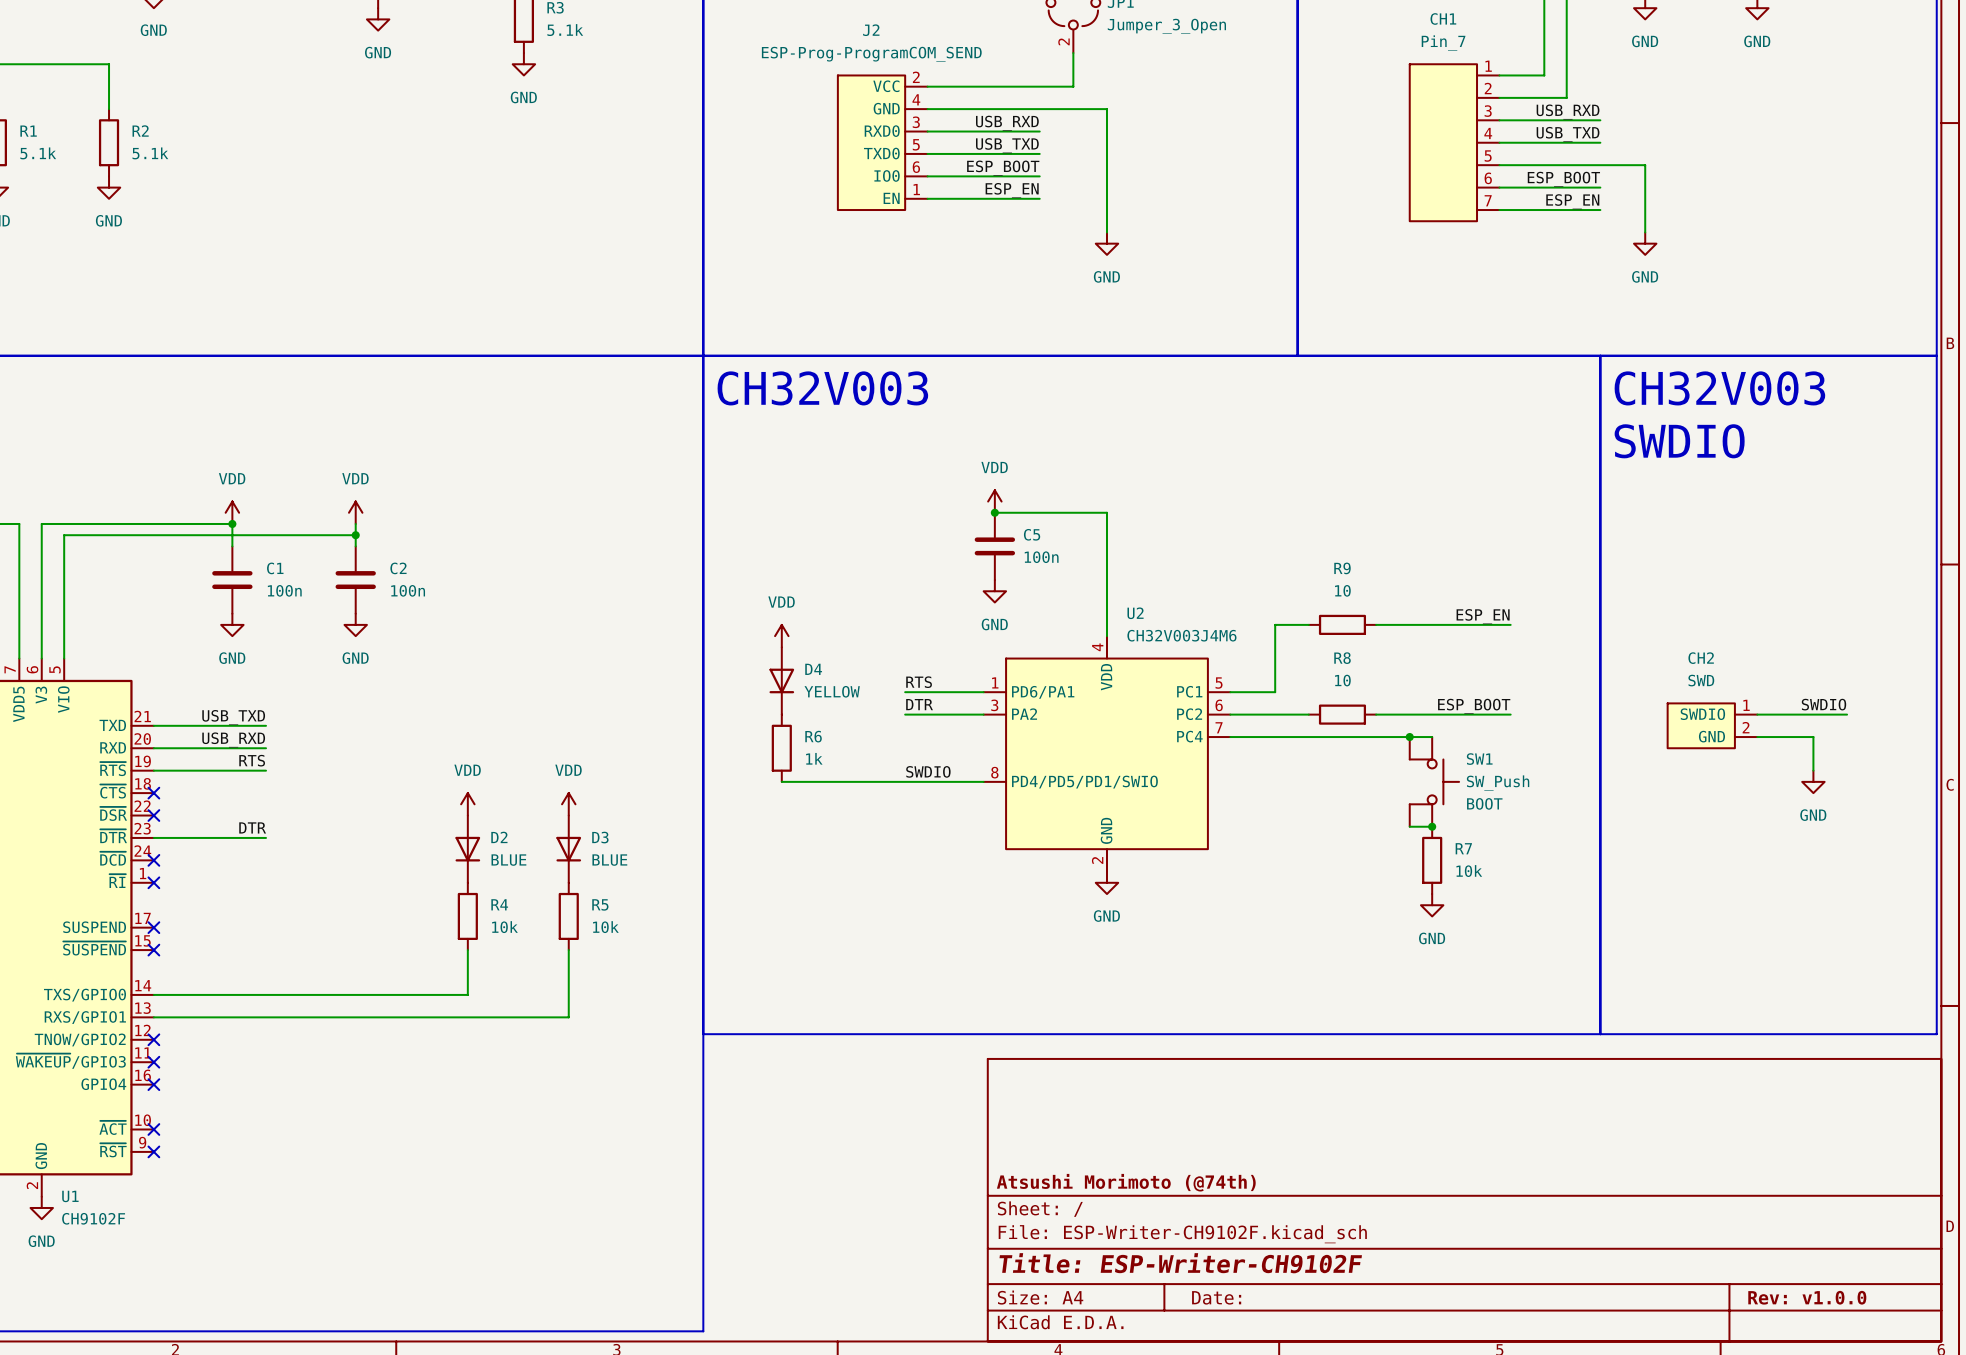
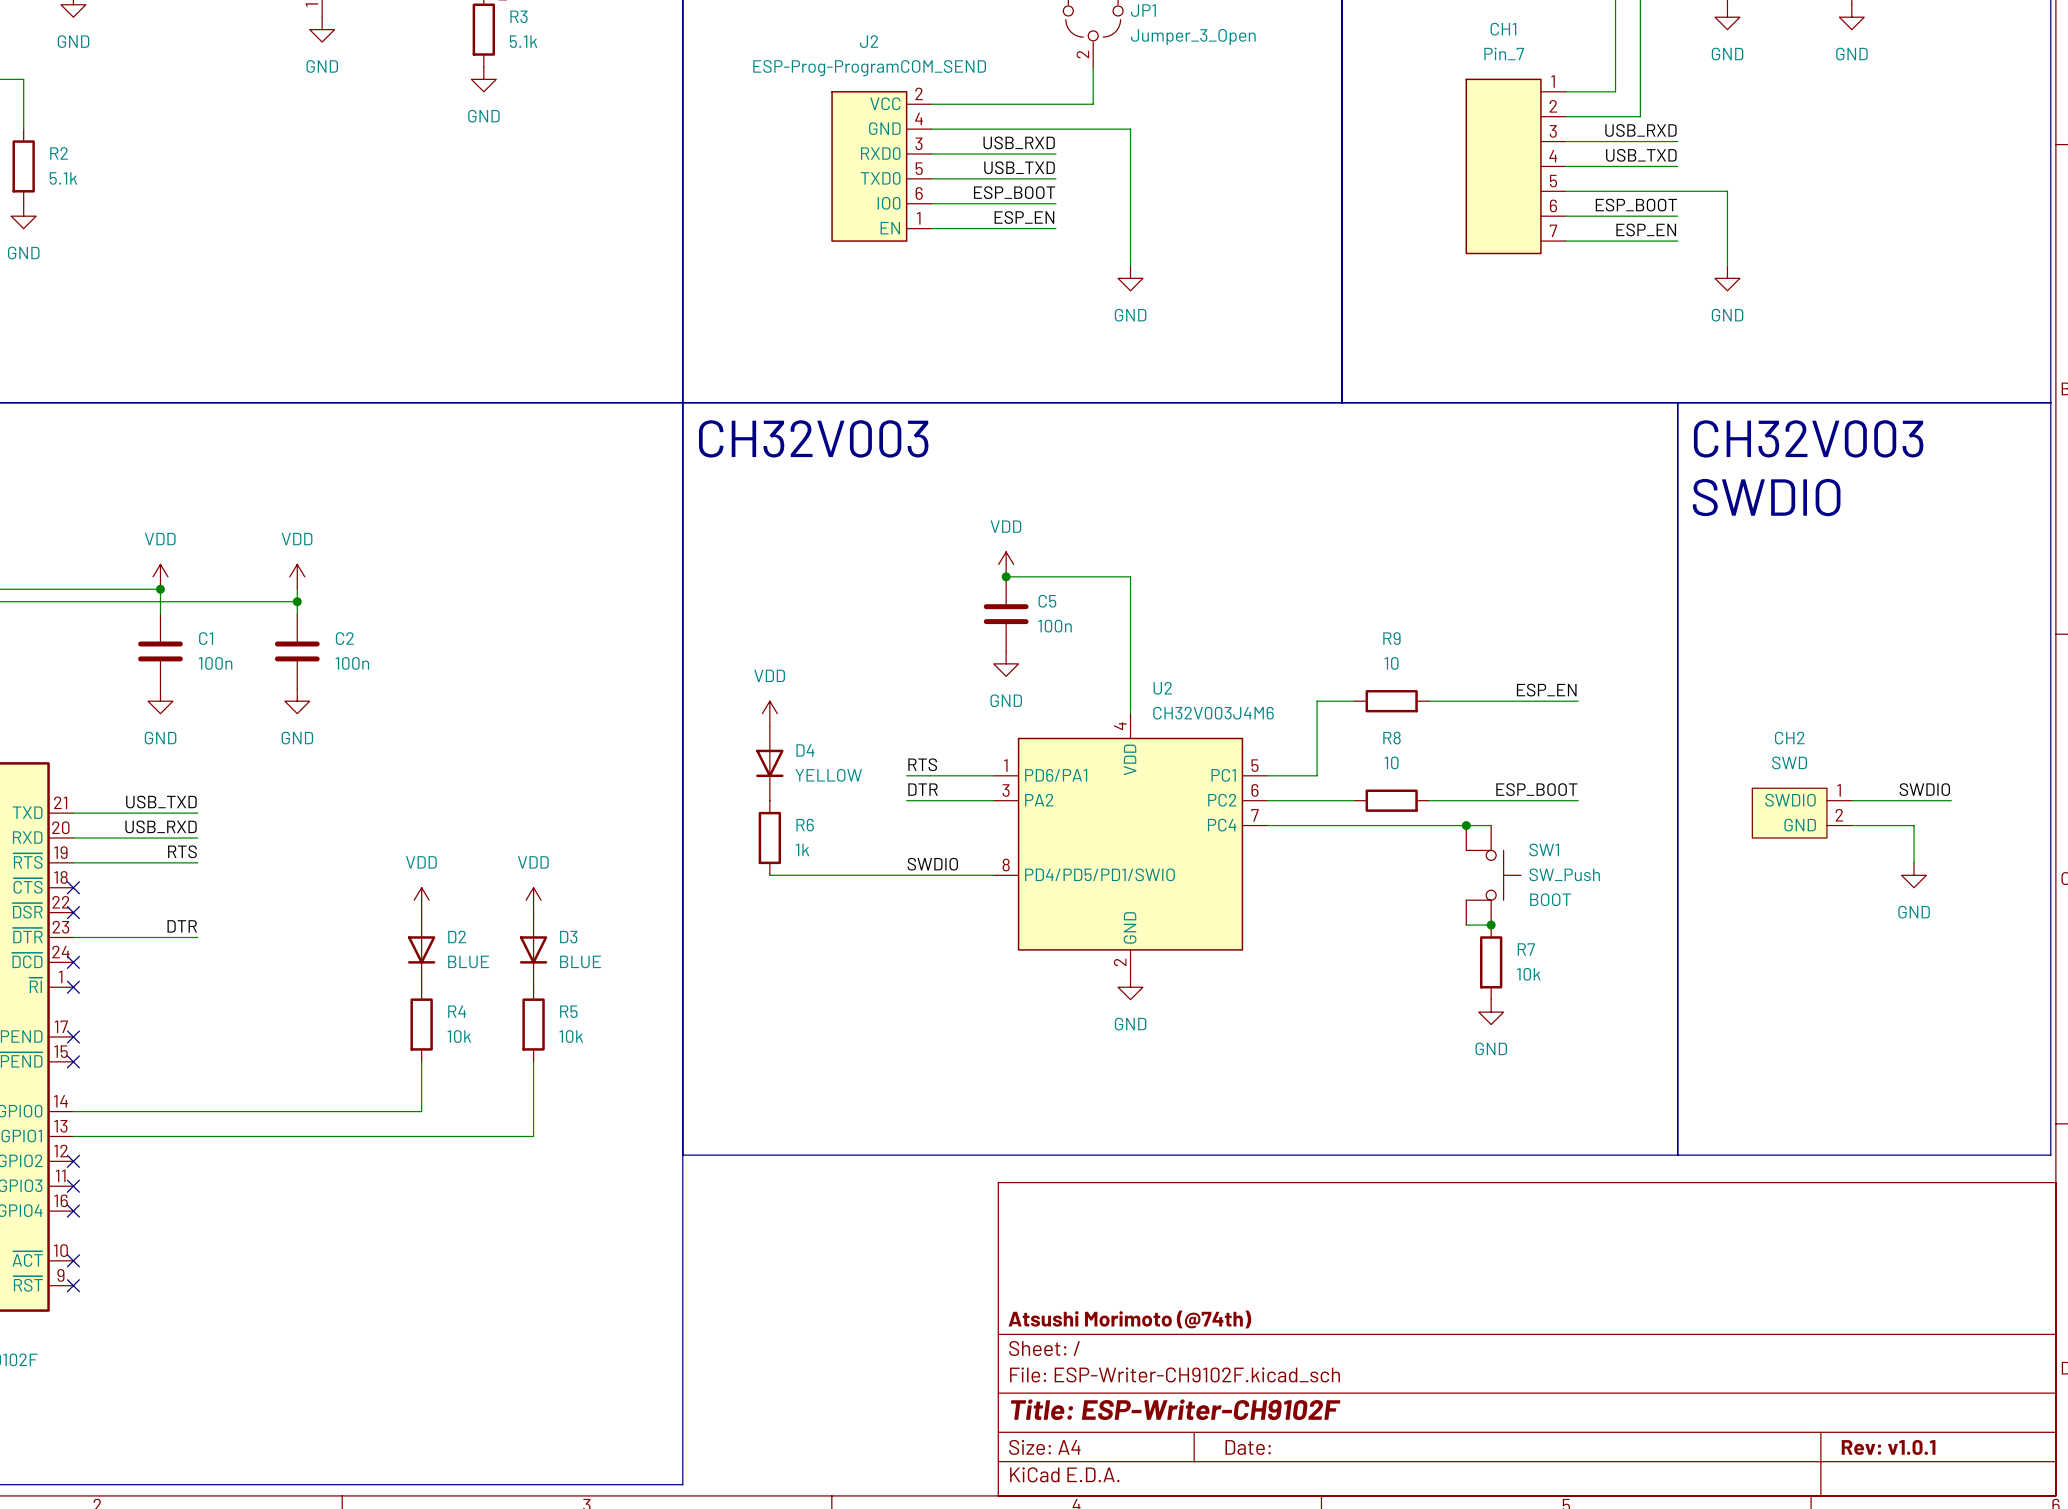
title block: Rev: v1.0.0 (1807, 1297) -> Rev: v1.0.1 (1888, 1447)

